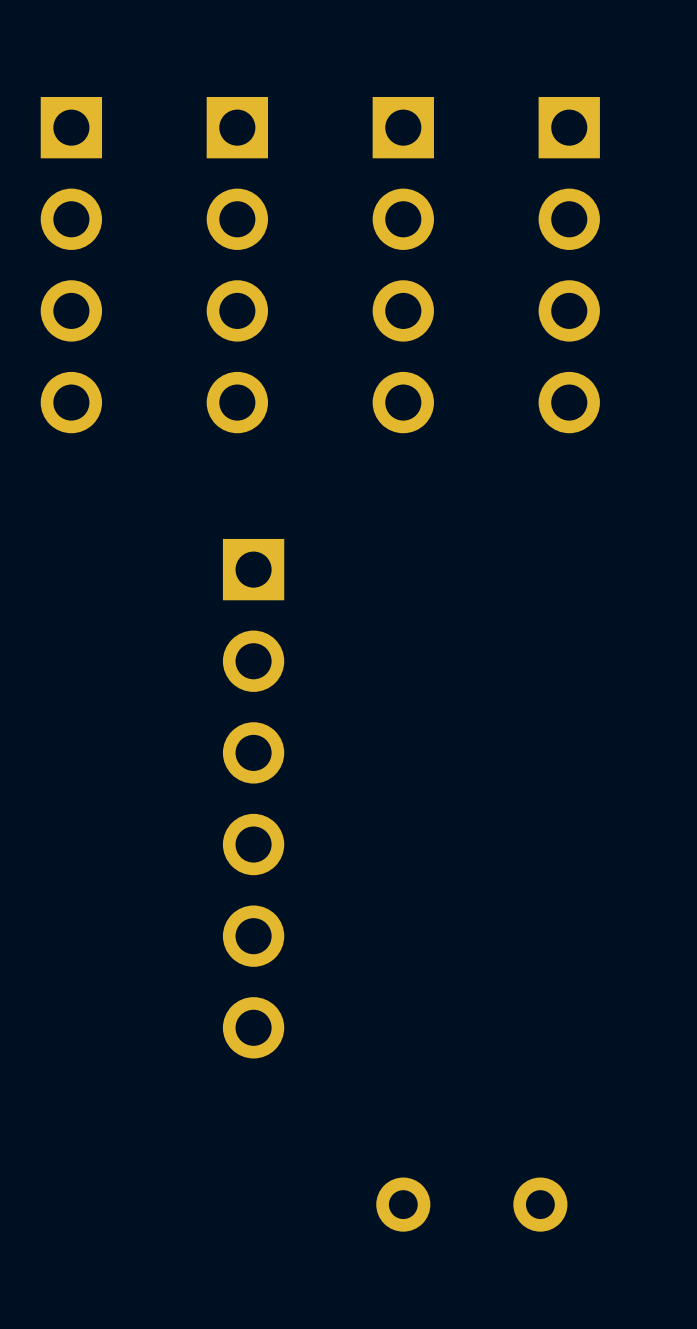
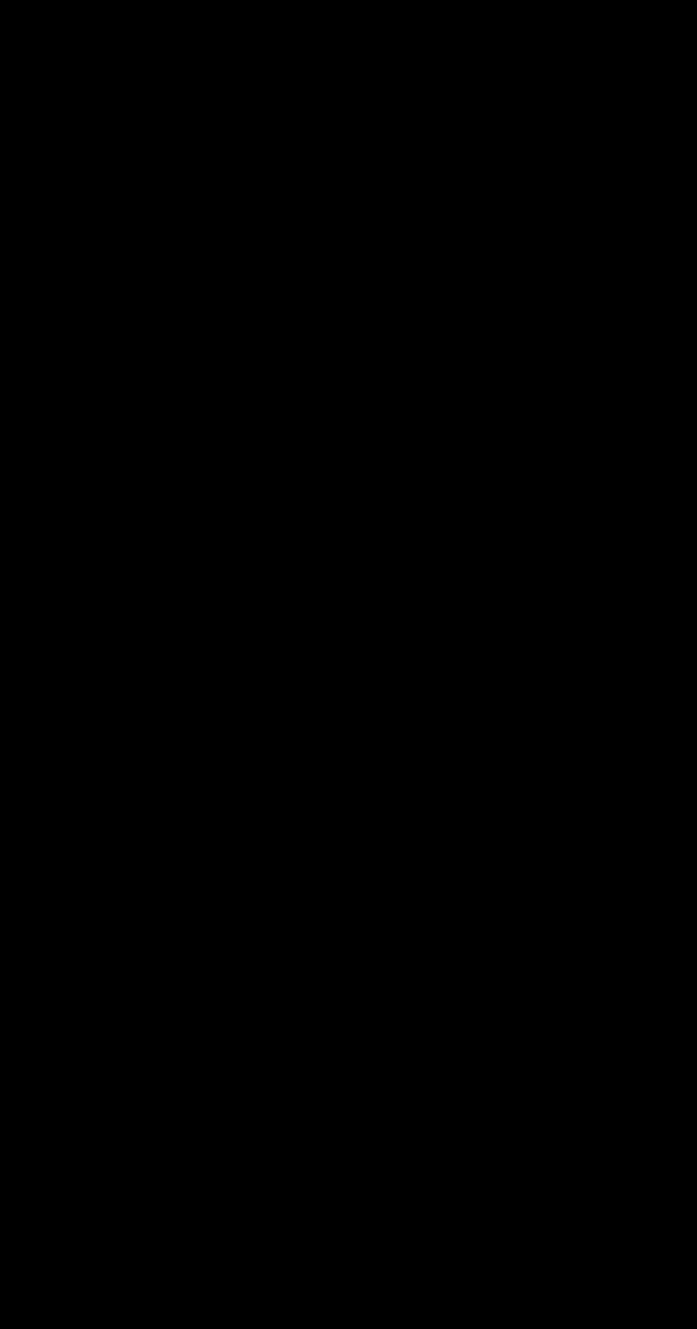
part: (71, 265) -> none
part: (237, 265) -> none
part: (403, 265) -> none
part: (569, 265) -> none
part: (253, 798) -> none
part: (471, 1204) -> none

